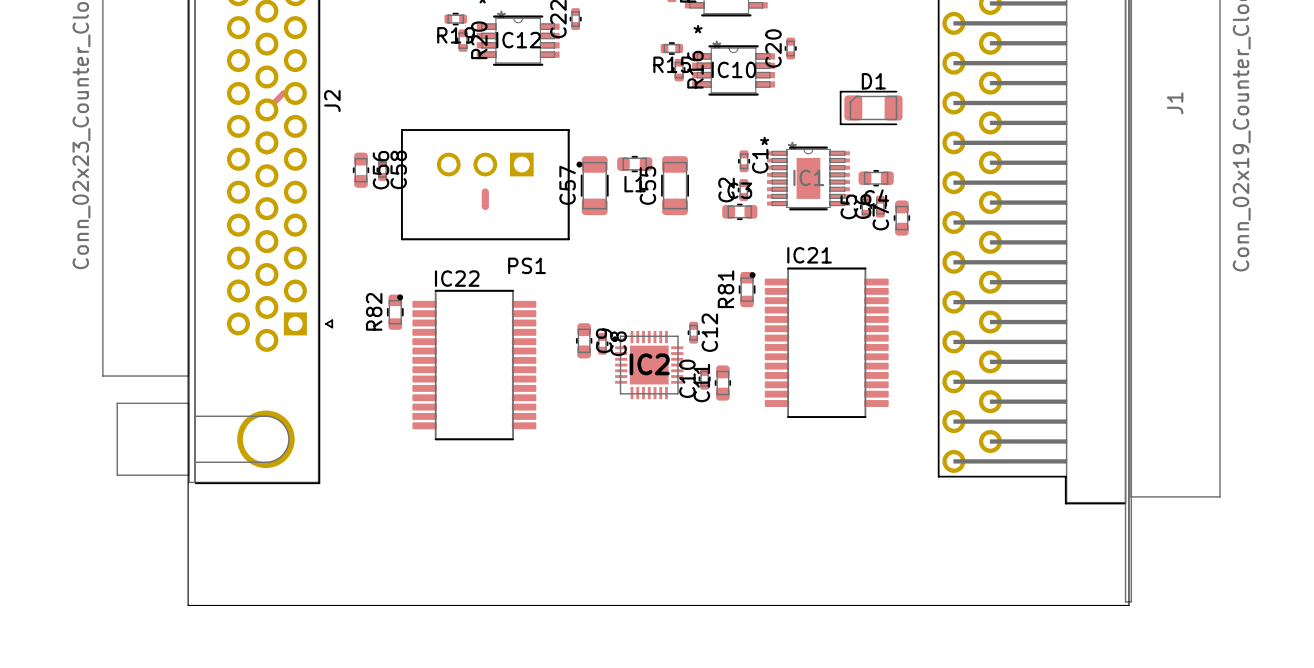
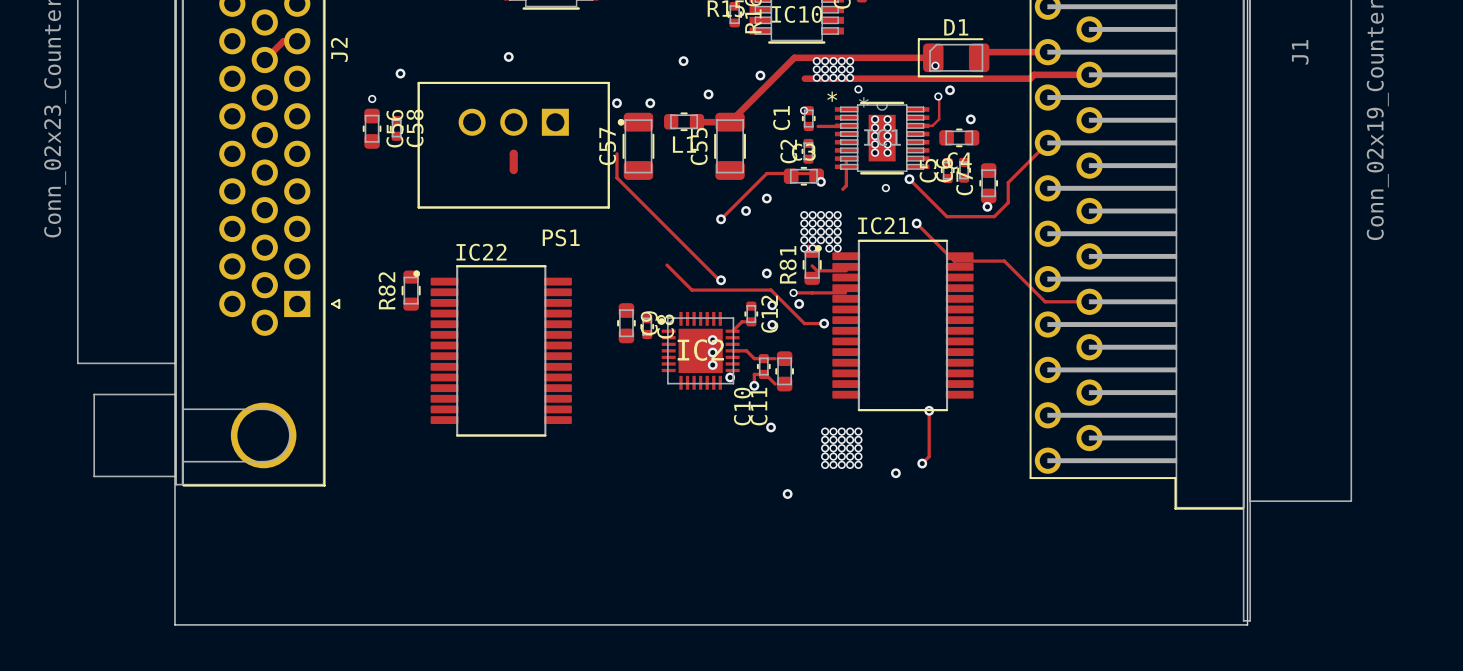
track: none -> (1047, 52) (984, 52) (979, 57)
via: none -> (508, 56)
via: none -> (683, 61)
via: none -> (816, 61)
via: none -> (825, 61)
via: none -> (833, 61)
via: none -> (841, 61)
via: none -> (850, 61)
track: none -> (935, 65) (933, 63) (933, 57) (794, 57) (730, 122) (697, 121)
via: none -> (935, 65)
via: none -> (816, 69)
via: none -> (825, 69)
via: none -> (833, 69)
via: none -> (841, 69)
via: none -> (850, 69)
via: none -> (400, 73)
track: none -> (1089, 74) (1034, 74) (1030, 78) (804, 78)
via: none -> (760, 75)
via: none -> (816, 77)
via: none -> (825, 77)
via: none -> (833, 77)
via: none -> (841, 77)
via: none -> (850, 77)
via: none -> (858, 89)
via: none -> (950, 90)
via: none -> (708, 94)
track: none -> (938, 96) (939, 119) (932, 125) (917, 125)
via: none -> (938, 96)
via: none -> (372, 99)
via: none -> (616, 103)
via: none -> (650, 103)
via: none -> (804, 110)
C1 name position: C1 (760, 161) -> C1 (781, 118)
via: none -> (875, 119)
via: none -> (887, 119)
via: none -> (970, 119)
track: none -> (846, 125) (818, 126)
via: none -> (875, 127)
via: none -> (887, 127)
via: none -> (875, 136)
via: none -> (887, 136)
track: none -> (1047, 142) (1008, 182) (1008, 202) (994, 216) (946, 216) (909, 179)
via: none -> (875, 144)
via: none -> (887, 144)
via: none -> (875, 152)
via: none -> (887, 152)
track: none -> (616, 153) (616, 177) (721, 280)
track: none -> (846, 158) (846, 185) (842, 189)
via: none -> (909, 179)
track: none -> (820, 181) (812, 173) (766, 173) (721, 219)
via: none -> (820, 181)
via: none -> (885, 188)
via: none -> (766, 198)
via: none -> (987, 206)
via: none -> (746, 210)
via: none -> (804, 215)
via: none -> (812, 215)
via: none -> (820, 215)
via: none -> (829, 215)
via: none -> (837, 215)
via: none -> (721, 219)
via: none -> (804, 223)
via: none -> (812, 223)
via: none -> (820, 223)
via: none -> (829, 223)
via: none -> (837, 223)
track: none -> (916, 223) (954, 261) (1004, 261) (1045, 301) (1089, 301)
via: none -> (916, 223)
via: none -> (804, 231)
via: none -> (812, 231)
via: none -> (820, 231)
via: none -> (829, 231)
via: none -> (837, 231)
via: none -> (804, 240)
via: none -> (812, 240)
via: none -> (820, 240)
via: none -> (829, 240)
via: none -> (837, 240)
via: none -> (804, 248)
via: none -> (812, 248)
via: none -> (829, 248)
via: none -> (837, 248)
track: none -> (666, 265) (691, 290) (771, 290) (804, 323) (824, 323)
track: none -> (812, 265) (817, 270) (846, 270)
via: none -> (766, 273)
via: none -> (721, 280)
track: none -> (793, 292) (845, 292)
via: none -> (793, 292)
via: none -> (799, 303)
via: none -> (772, 305)
track: none -> (751, 321) (741, 321) (732, 331)
via: none -> (824, 323)
via: none -> (772, 324)
via: none -> (712, 340)
track: none -> (732, 350) (746, 350) (754, 358) (775, 358)
via: none -> (712, 352)
via: none -> (712, 365)
C10 name position: C10 (687, 378) -> C10 (742, 406)
C11 name position: C11 (701, 383) -> C11 (759, 406)
via: none -> (730, 377)
track: none -> (775, 384) (765, 374) (754, 374) (754, 385)
via: none -> (754, 385)
track: none -> (929, 410) (929, 456) (922, 463)
via: none -> (929, 410)
via: none -> (771, 427)
via: none -> (825, 431)
via: none -> (833, 431)
via: none -> (841, 431)
via: none -> (850, 431)
via: none -> (858, 431)
via: none -> (825, 439)
via: none -> (833, 439)
via: none -> (841, 439)
via: none -> (850, 439)
via: none -> (858, 439)
via: none -> (825, 448)
via: none -> (833, 448)
via: none -> (841, 448)
via: none -> (850, 448)
via: none -> (858, 448)
via: none -> (825, 456)
via: none -> (833, 456)
via: none -> (841, 456)
via: none -> (850, 456)
via: none -> (858, 456)
via: none -> (922, 463)
via: none -> (825, 464)
via: none -> (833, 464)
via: none -> (841, 464)
via: none -> (850, 464)
via: none -> (858, 464)
via: none -> (895, 473)
via: none -> (787, 494)

